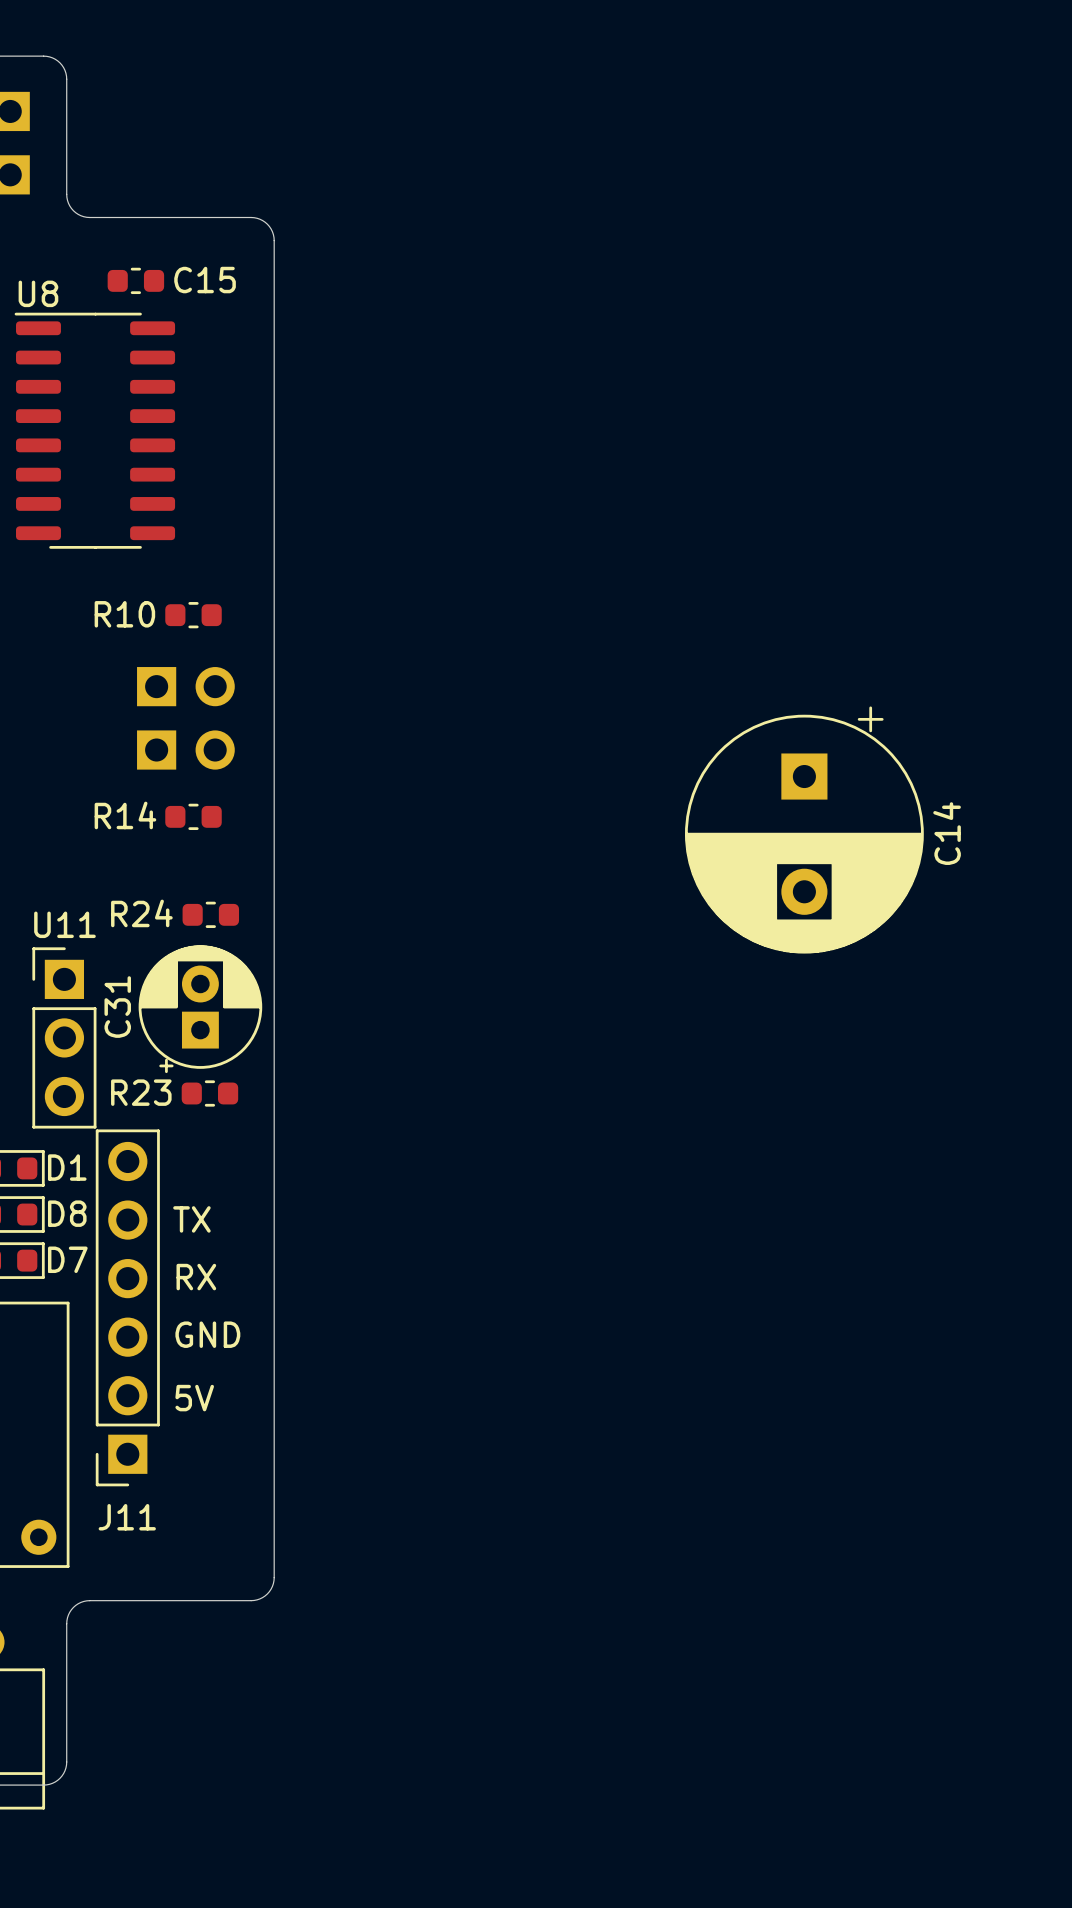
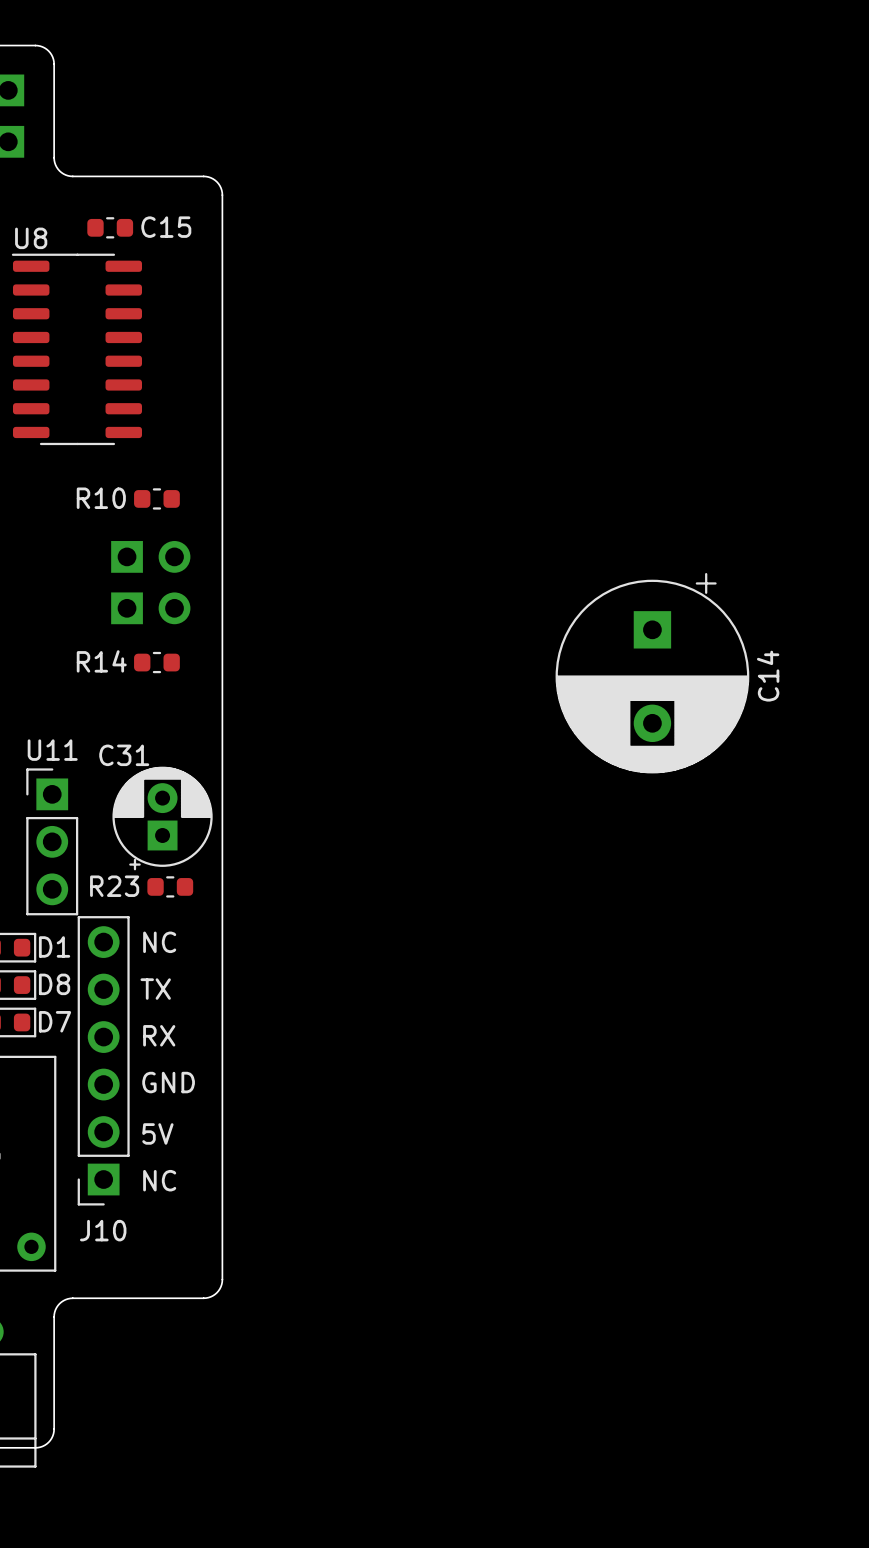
R24: (210, 914) -> none
C31 name rotation: 0° (117, 1007) -> 90° clockwise (124, 755)
C31 name position: C31 (117, 1007) -> C31 (124, 755)
text: none -> NC (159, 942)
text: none -> NC (159, 1180)
J11 name: J11 (127, 1517) -> J10 (103, 1230)

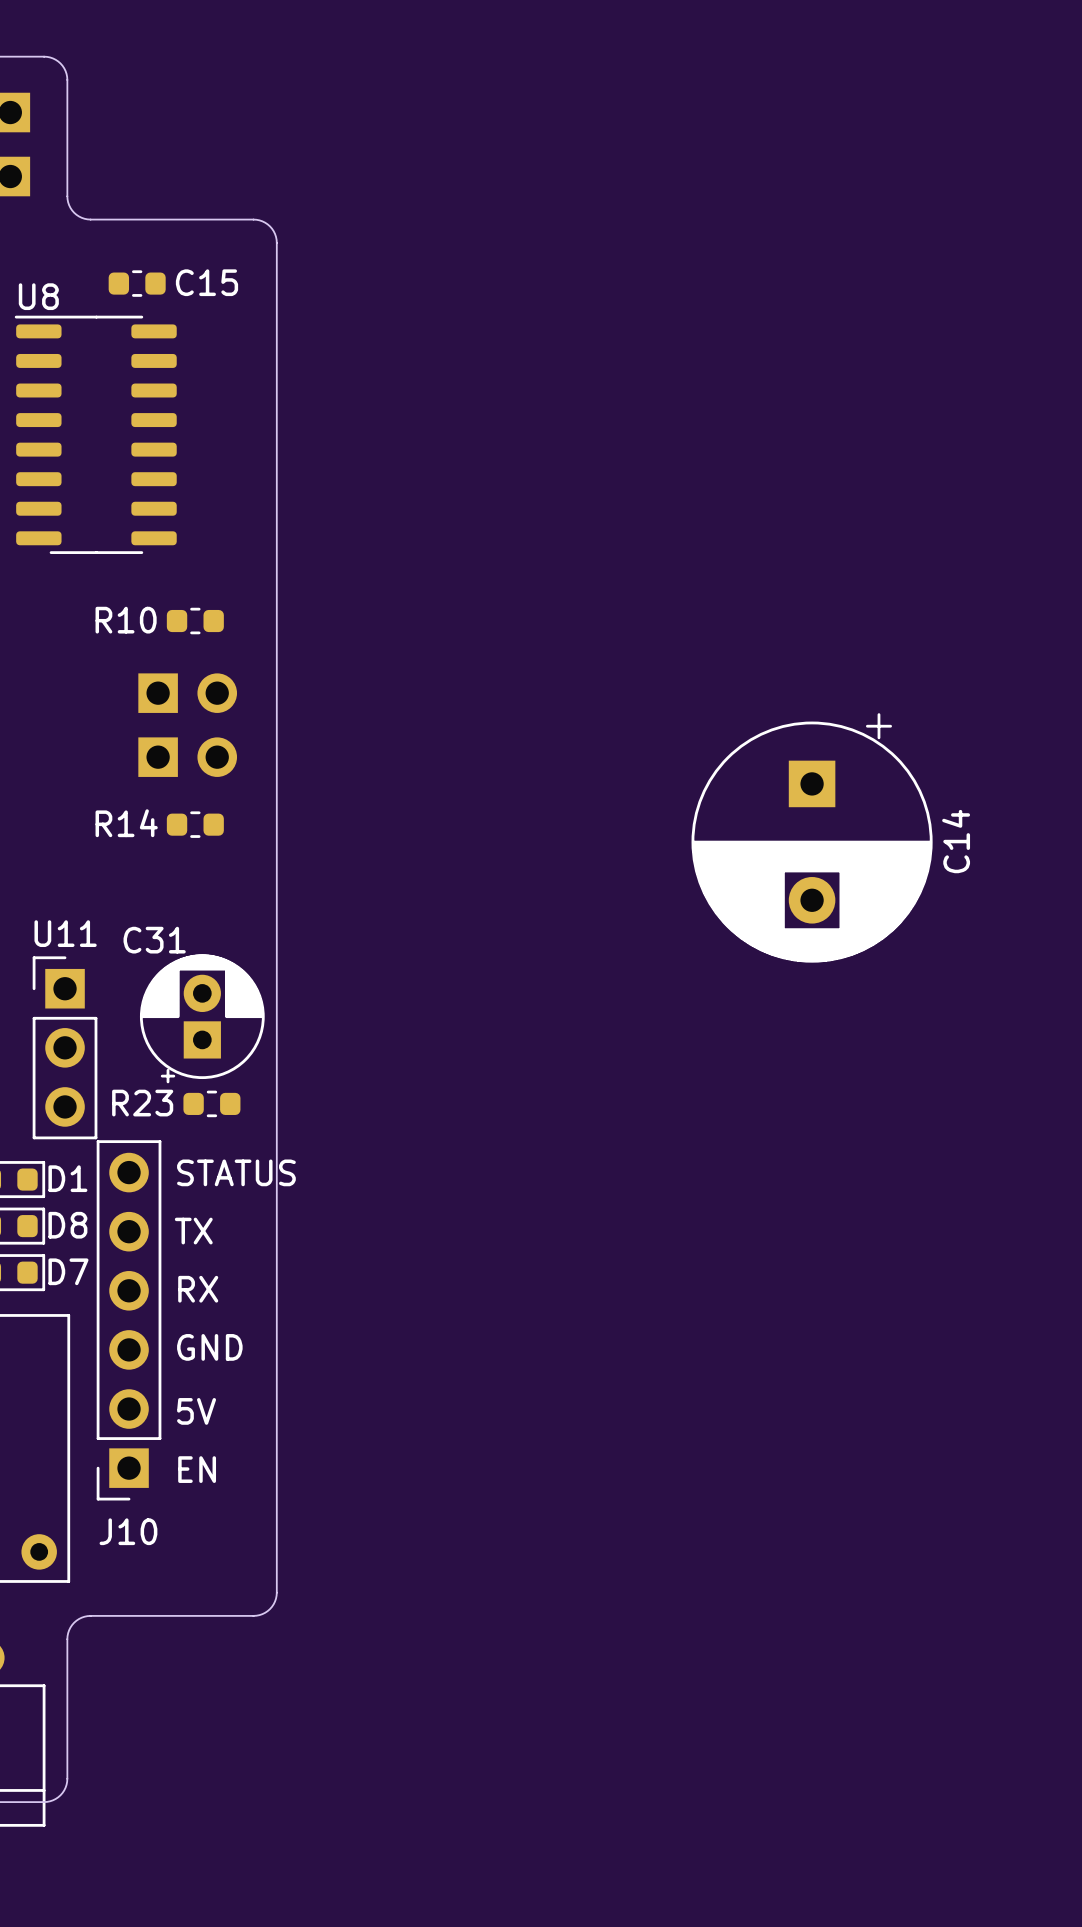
text: NC (159, 942) -> STATUS (236, 1172)
text: NC (159, 1180) -> EN (197, 1469)

